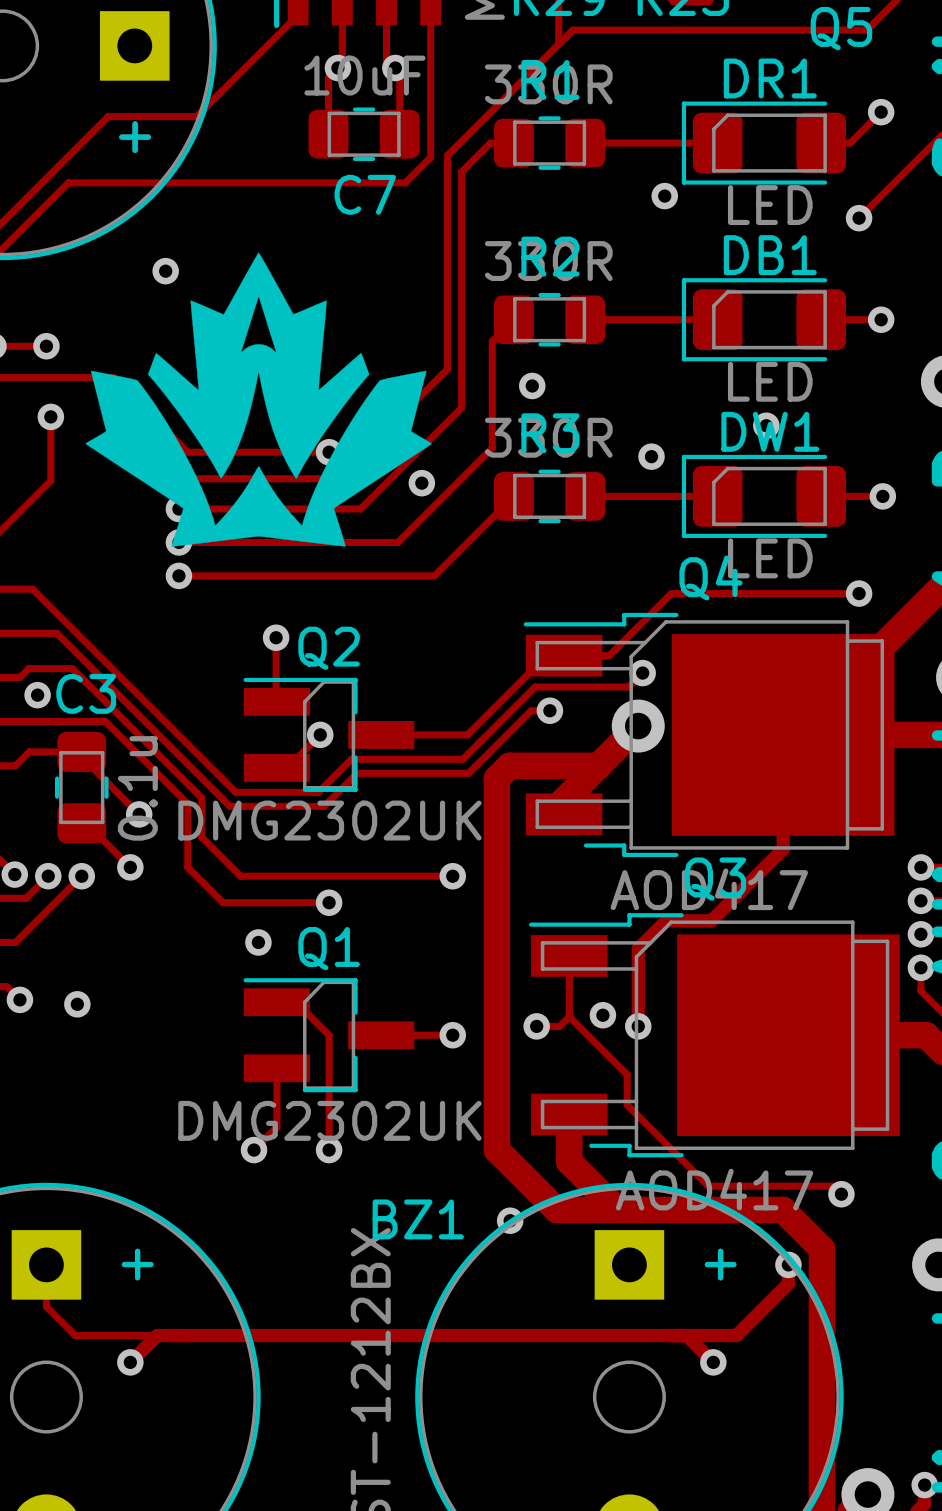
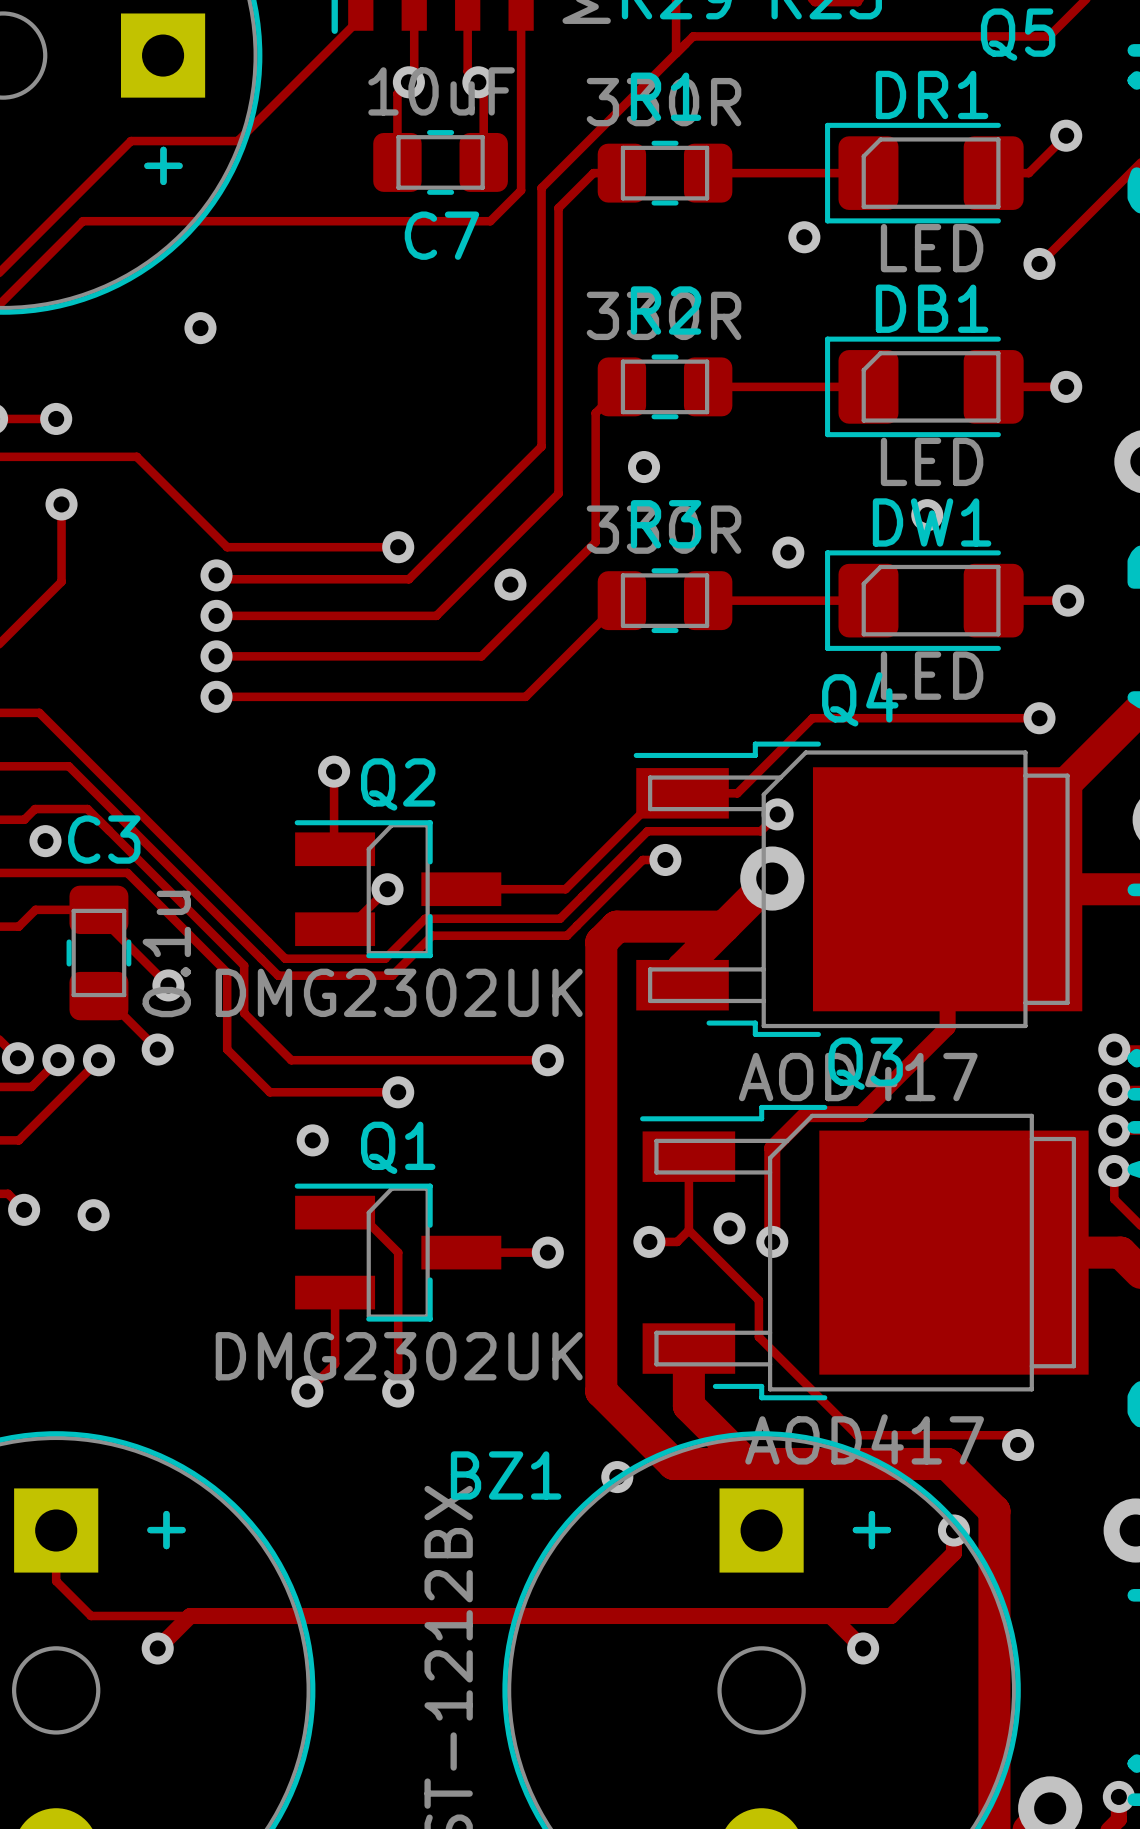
drawing: [85, 252, 432, 547] -> none

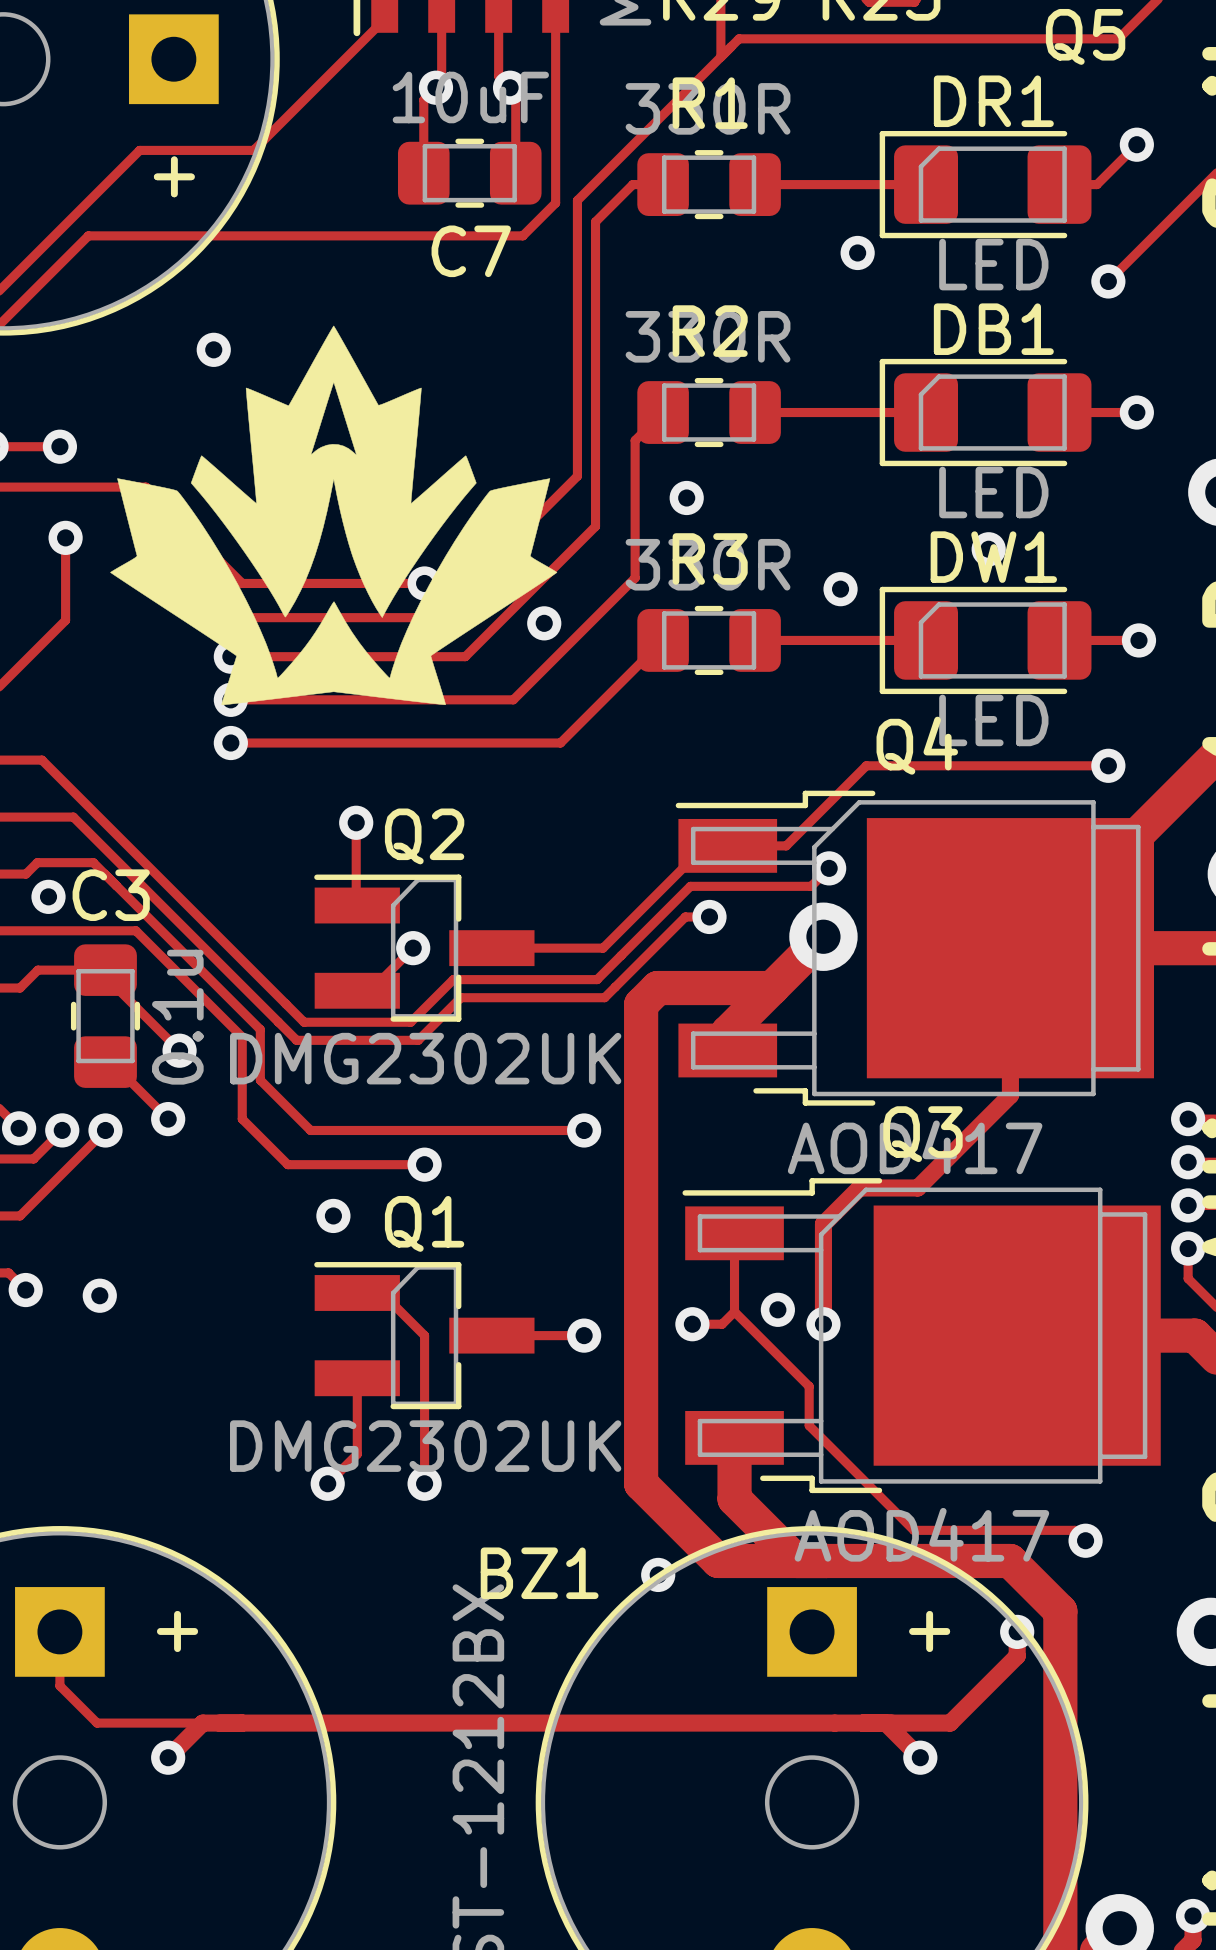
drawing: none -> [110, 325, 558, 706]

